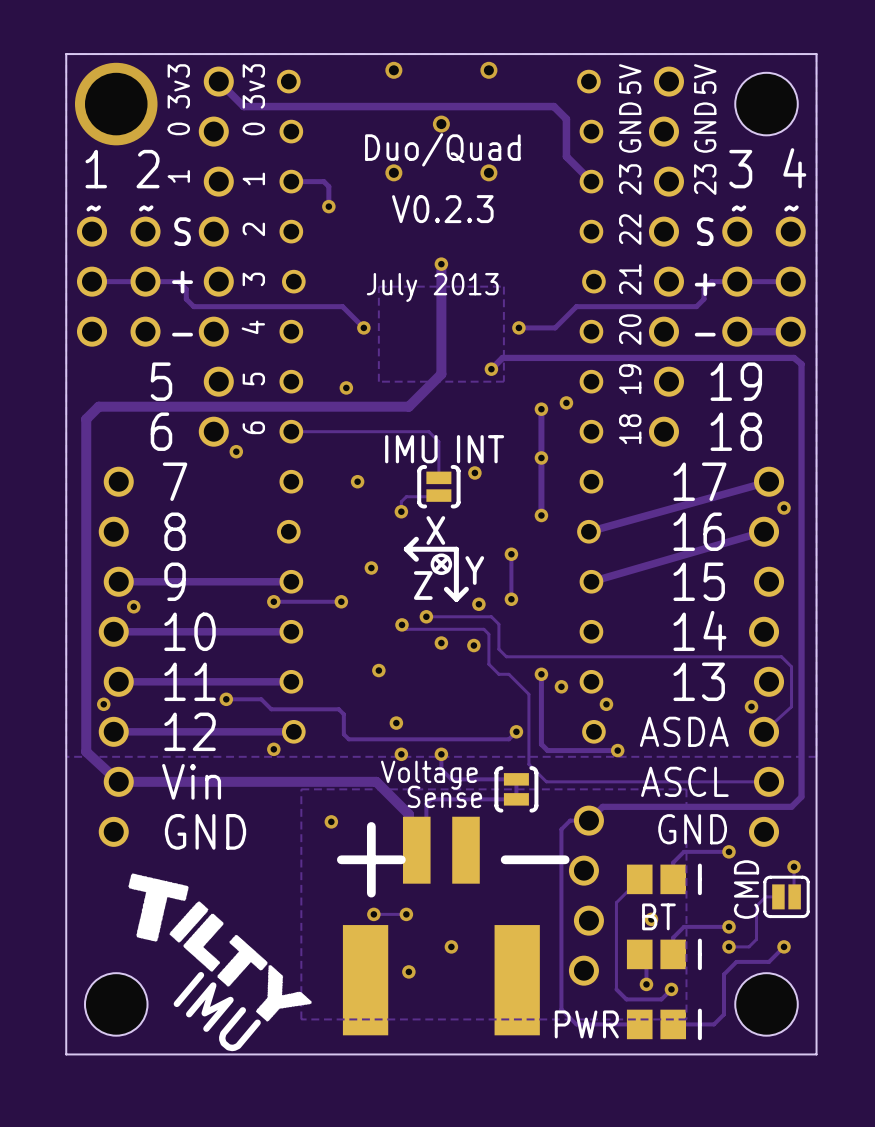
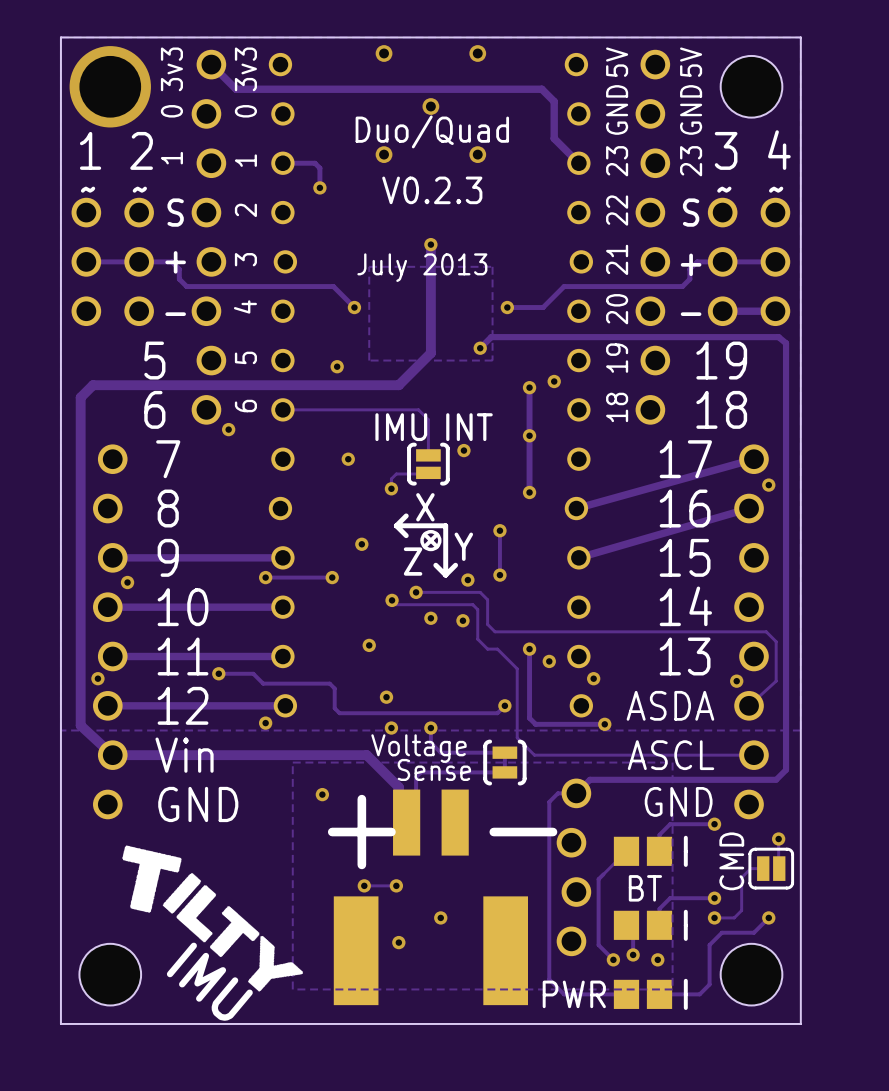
track: (616, 902) (616, 989) (626, 999) (661, 999) (671, 989) -> (603, 874) (598, 879) (598, 945) (613, 959)
via position: (651, 919) -> (613, 959)

